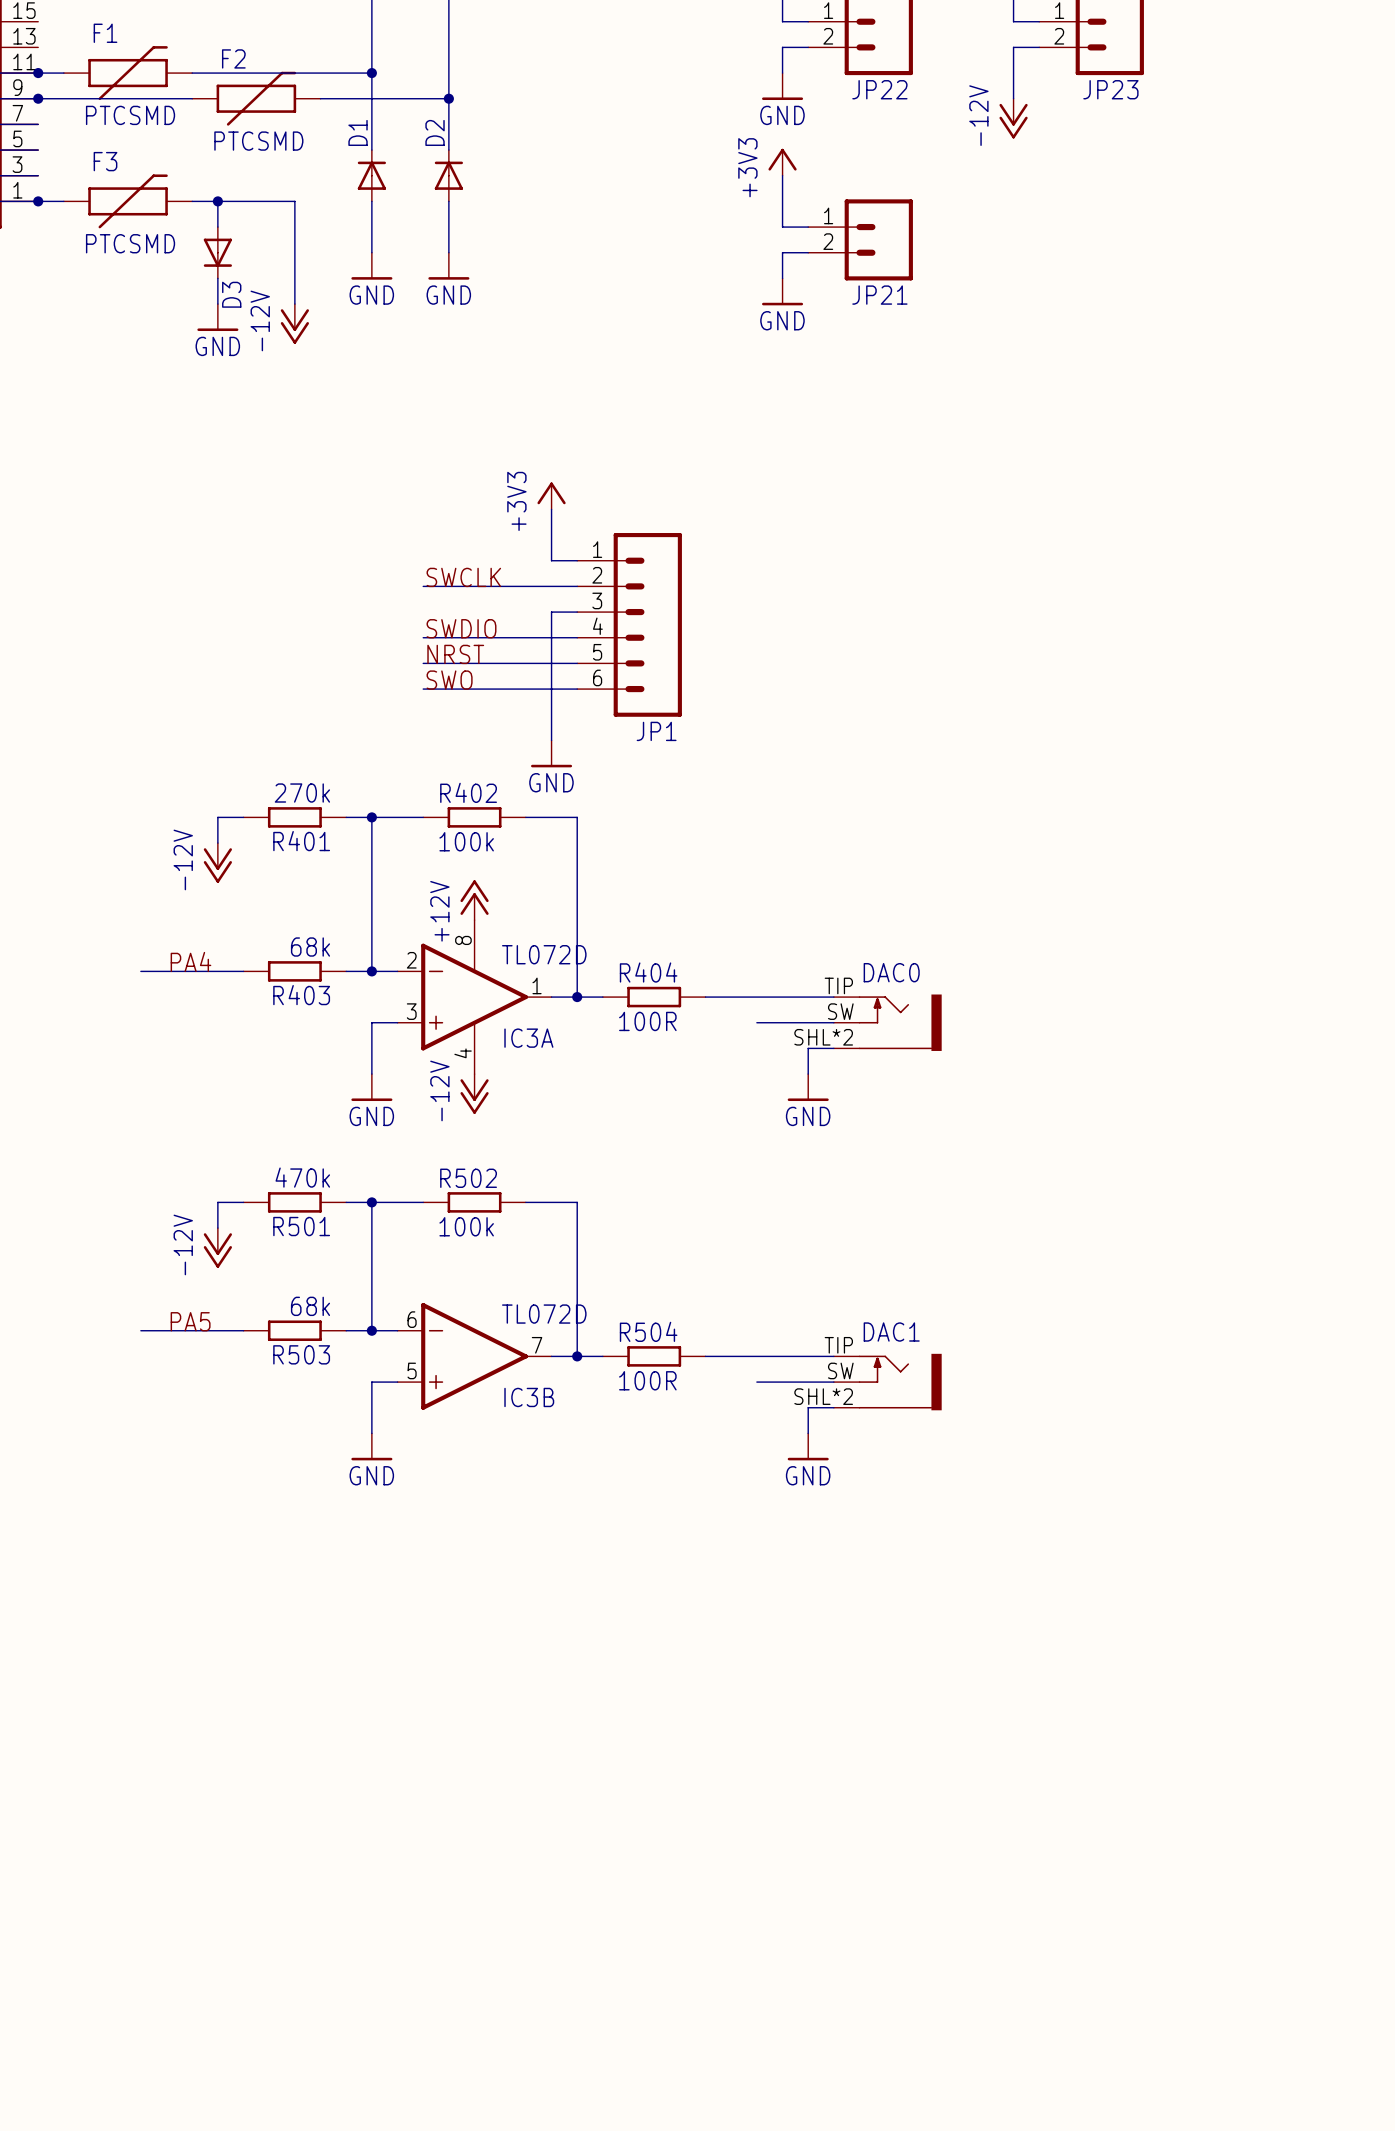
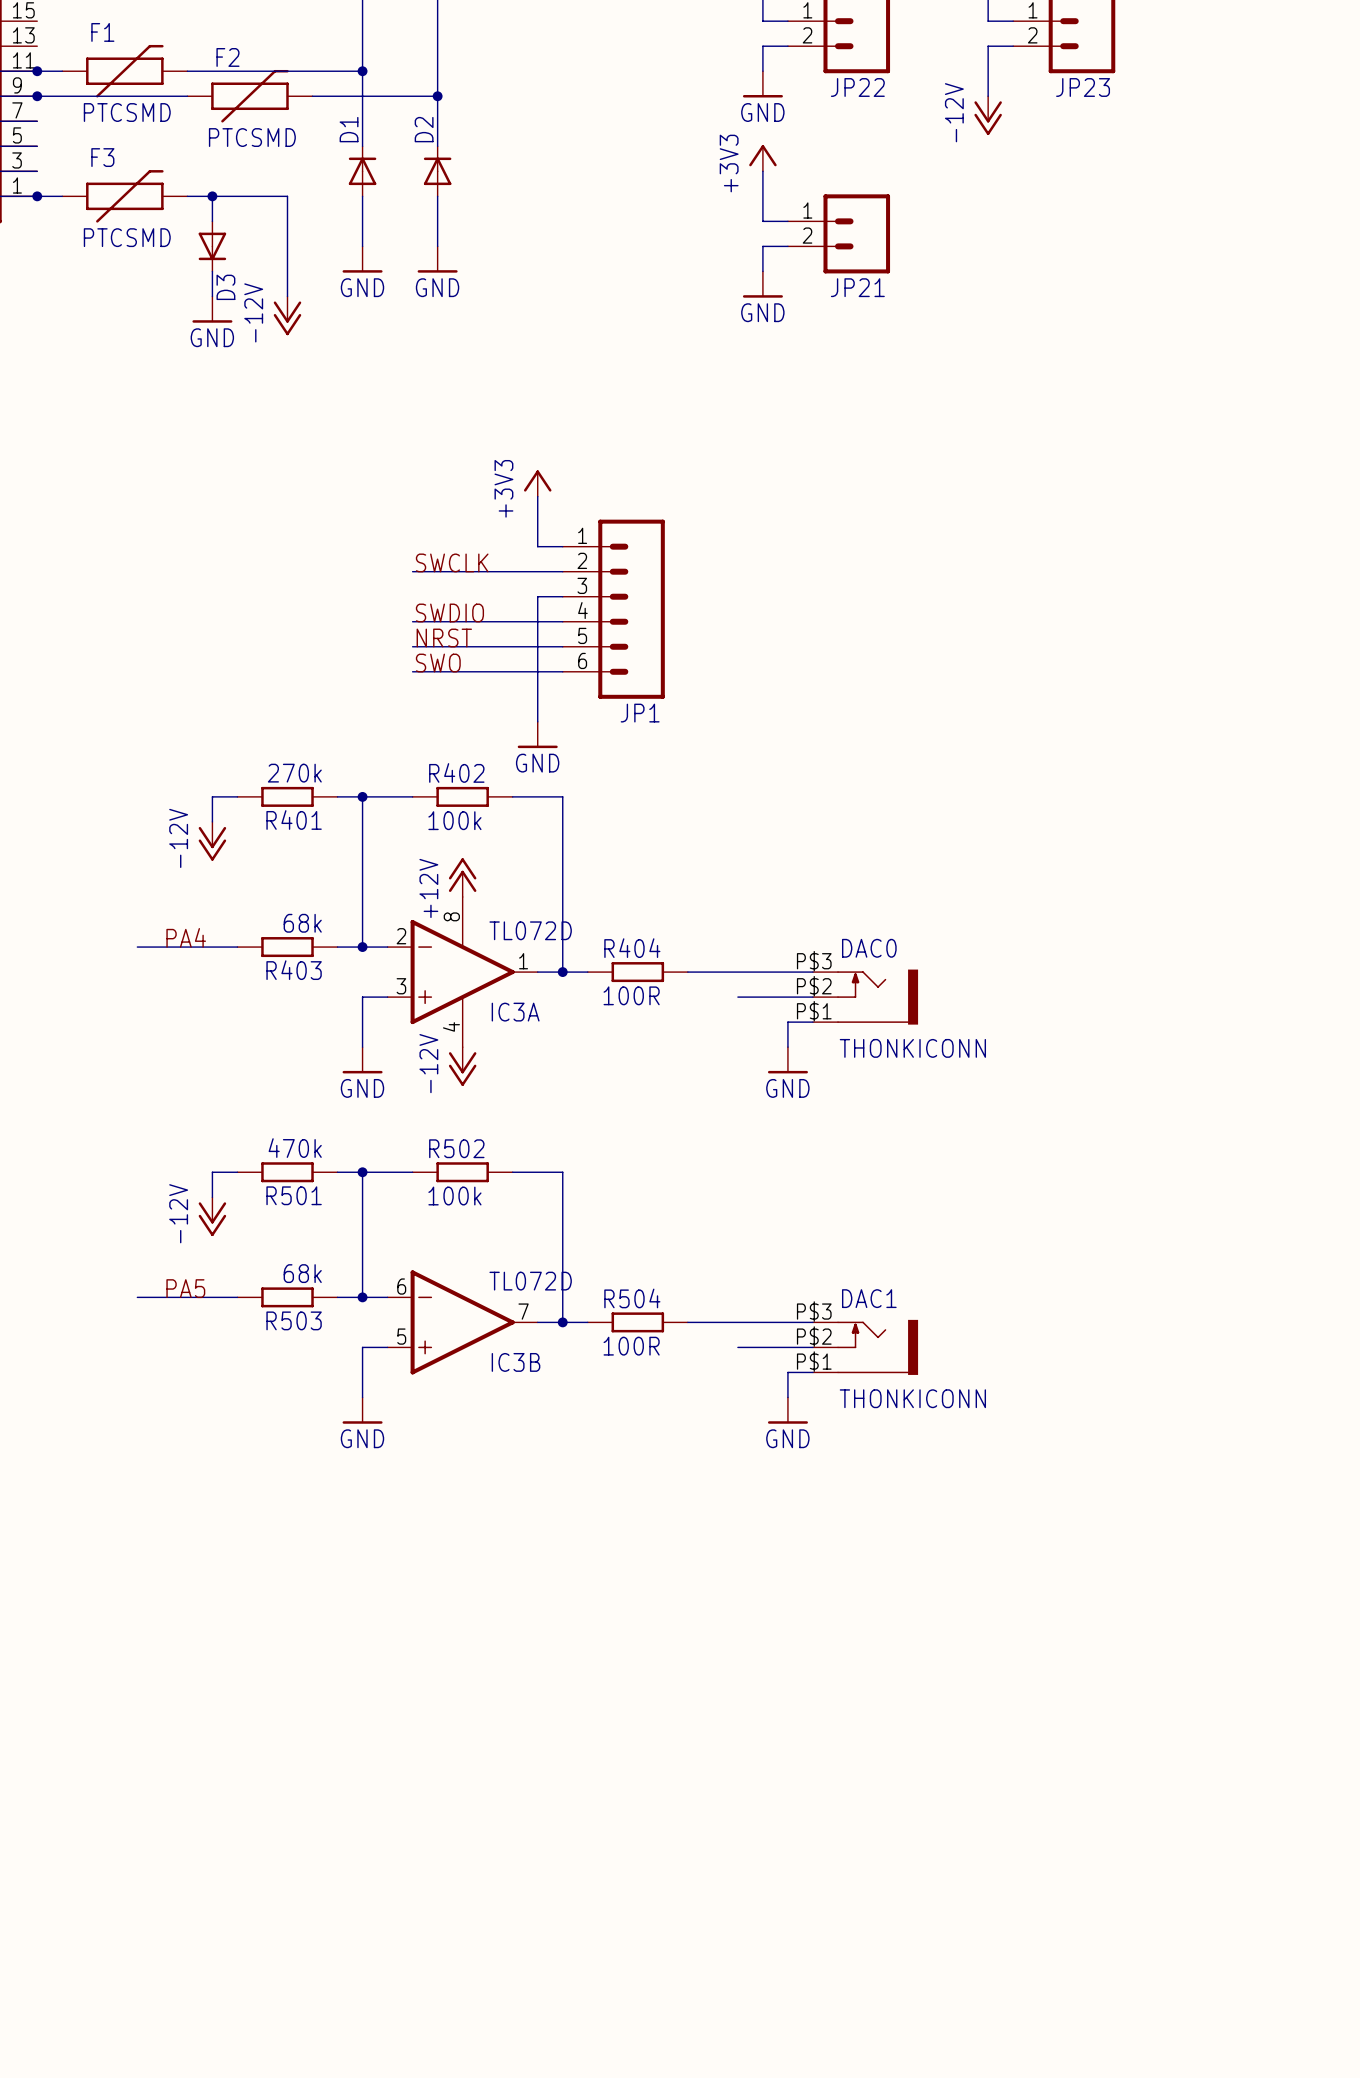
DAC0 pin number: TIP (838, 985) -> P$3 (814, 961)
DAC0 pin number: SW (840, 1011) -> P$2 (814, 986)
DAC0 pin number: SHL*2 (823, 1037) -> P$1 (814, 1011)
DAC0 value: none -> THONKICONN (912, 1048)
DAC1 pin number: TIP (838, 1345) -> P$3 (814, 1311)
DAC1 pin number: SW (840, 1370) -> P$2 (814, 1336)
DAC1 pin number: SHL*2 (823, 1396) -> P$1 (814, 1361)
DAC1 value: none -> THONKICONN (912, 1398)

